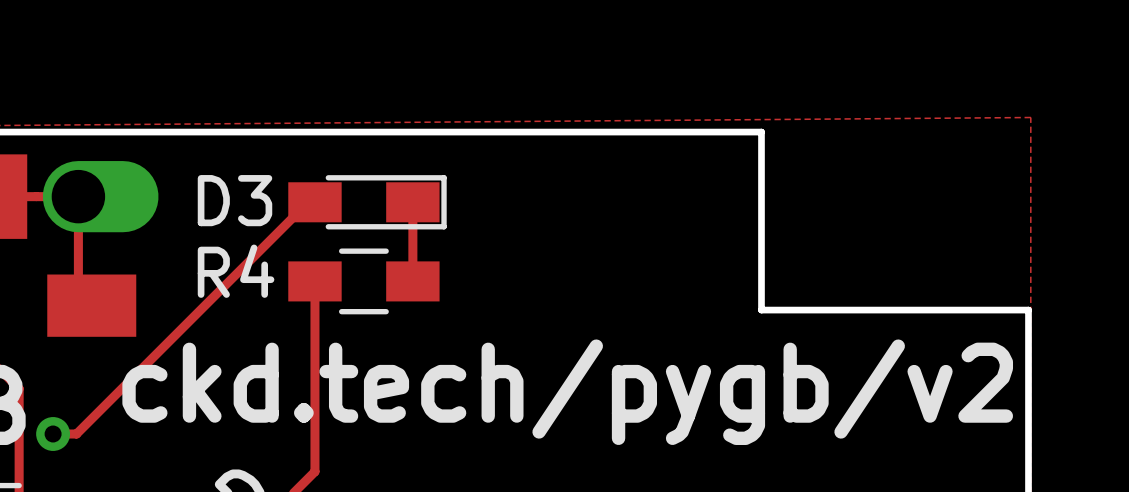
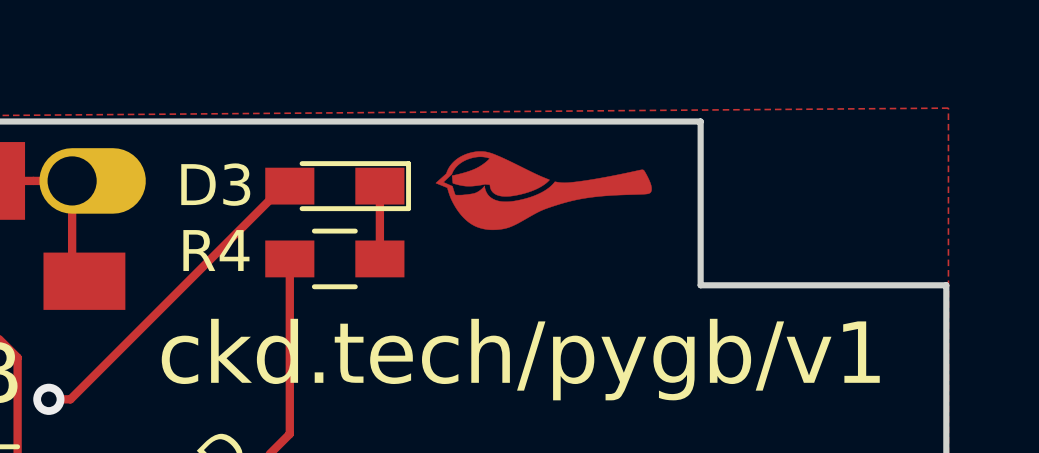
drawing: none -> [435, 151, 652, 231]
text: ckd.tech/pygb/v2 (567, 392) -> ckd.tech/pygb/v1 (520, 359)

